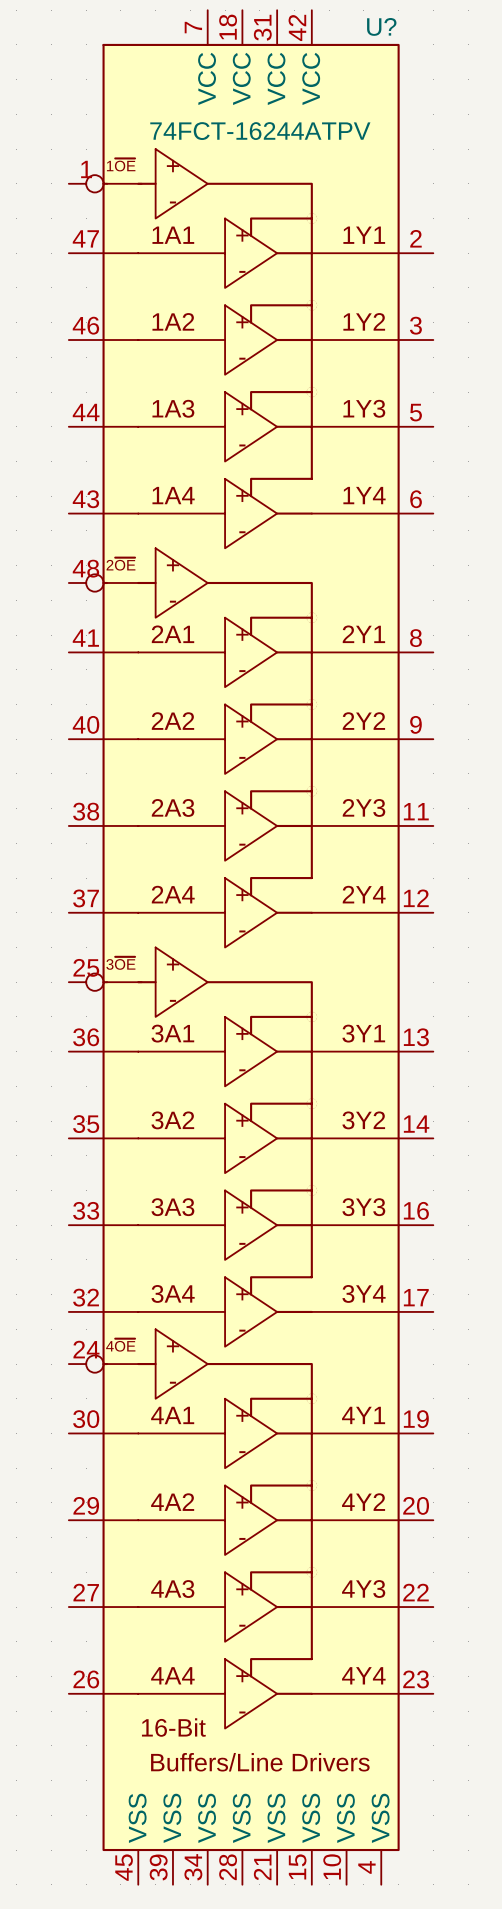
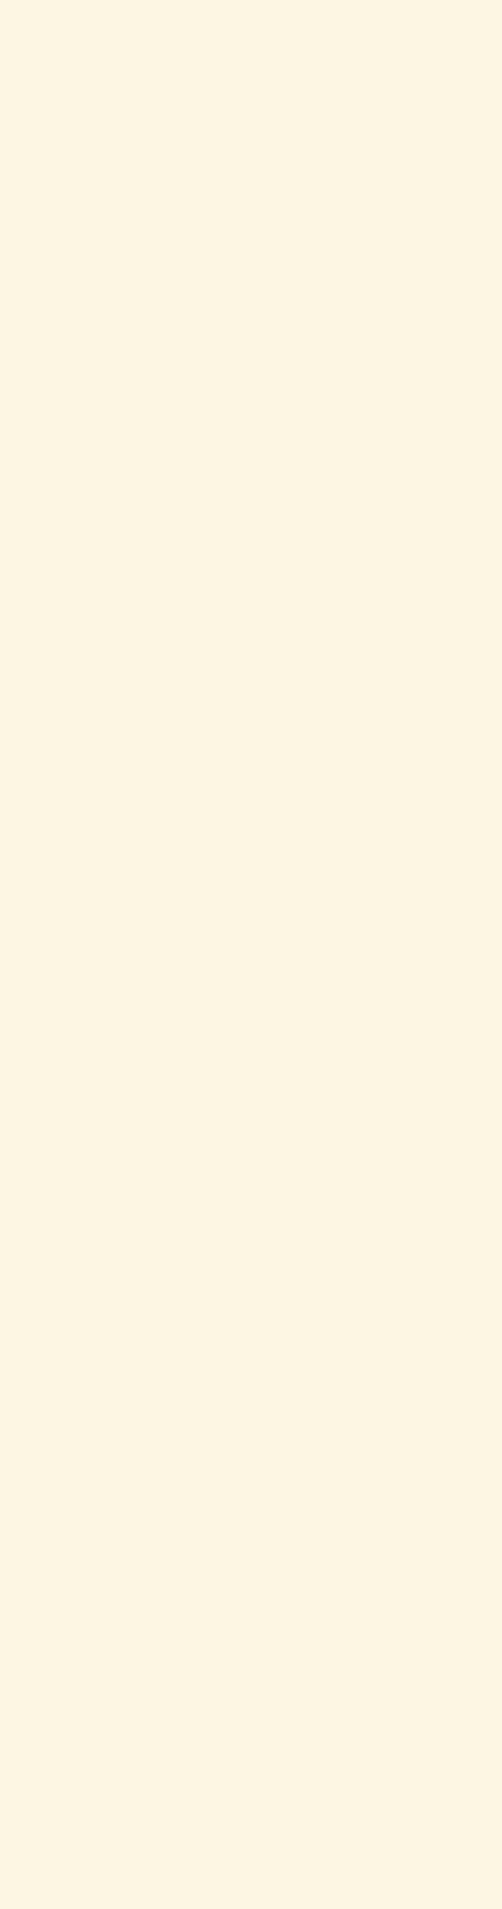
U?: 74FCT-16244ATPV (251, 947) -> none

